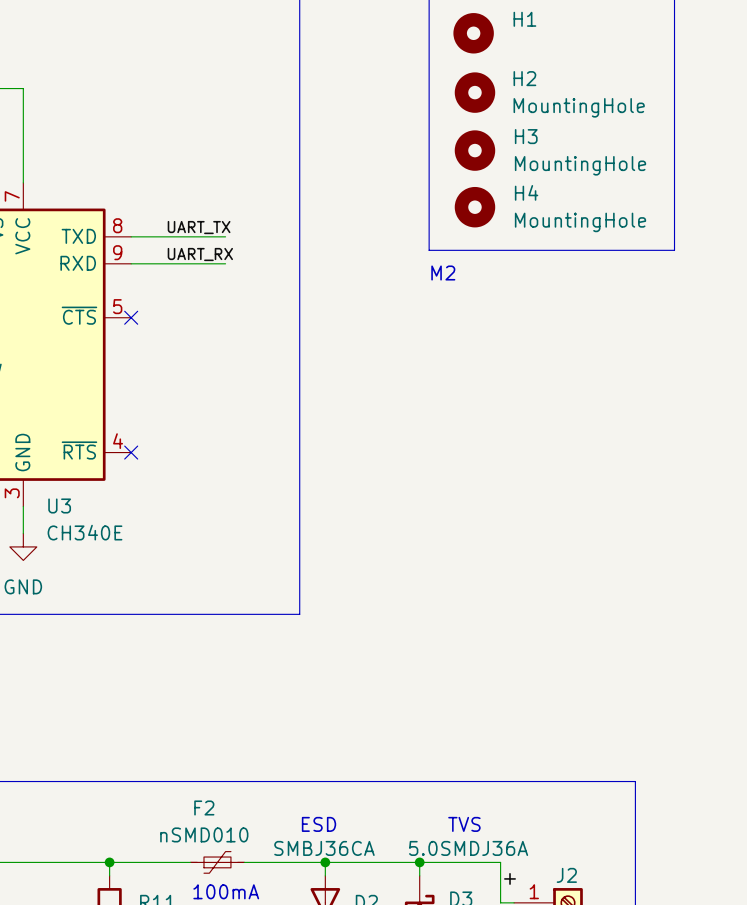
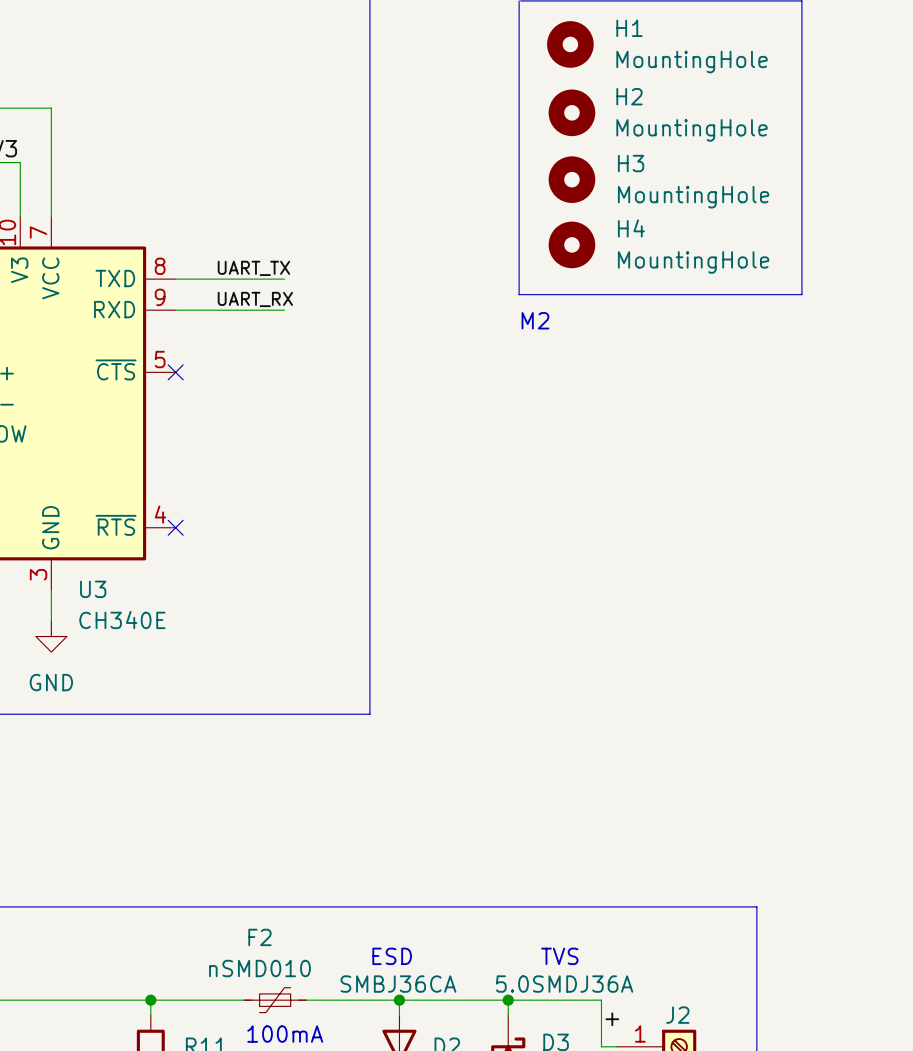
H1 value: none -> MountingHole (692, 62)

